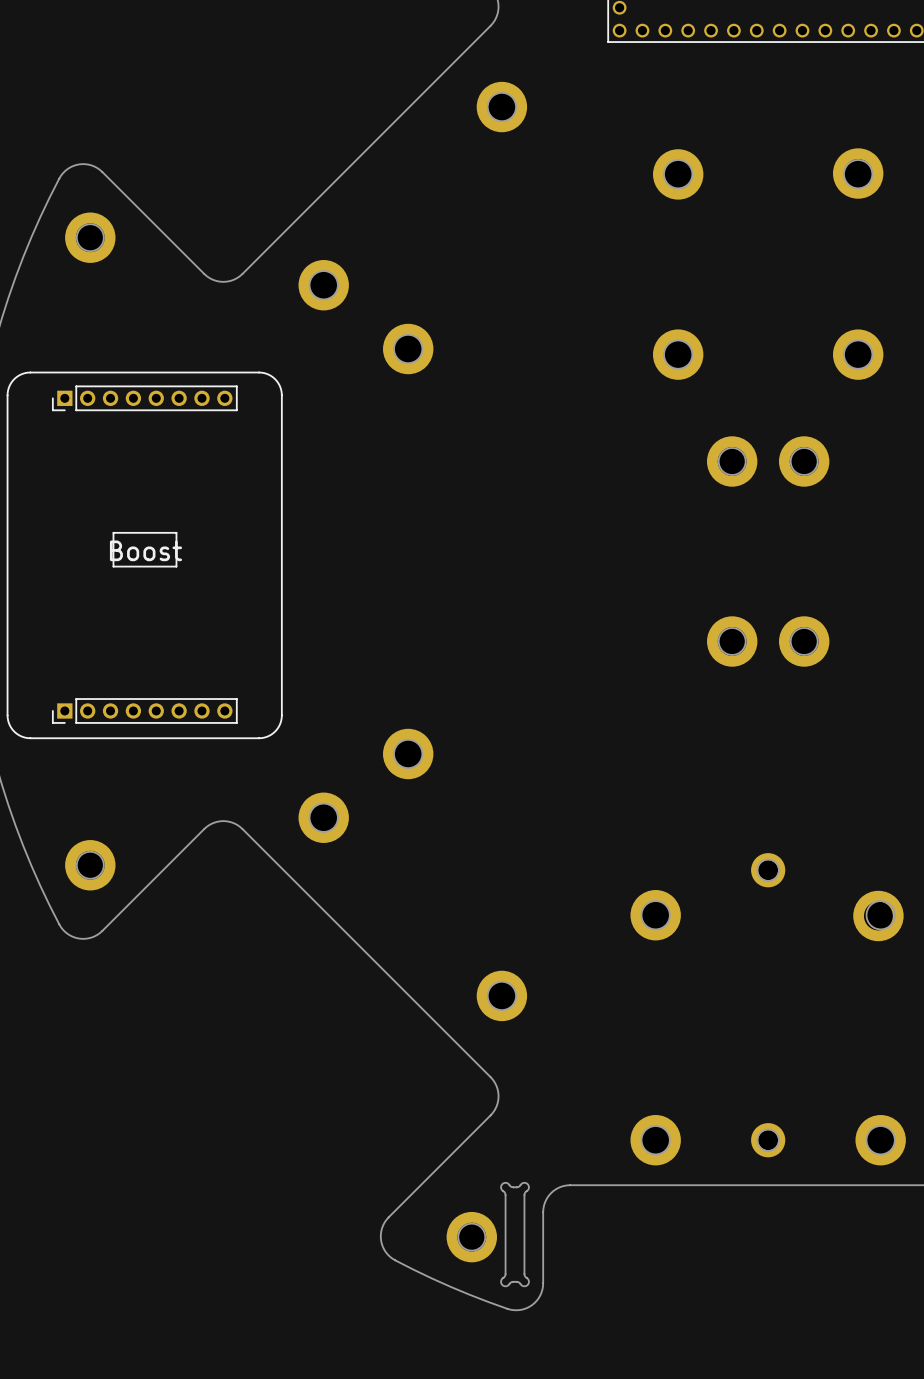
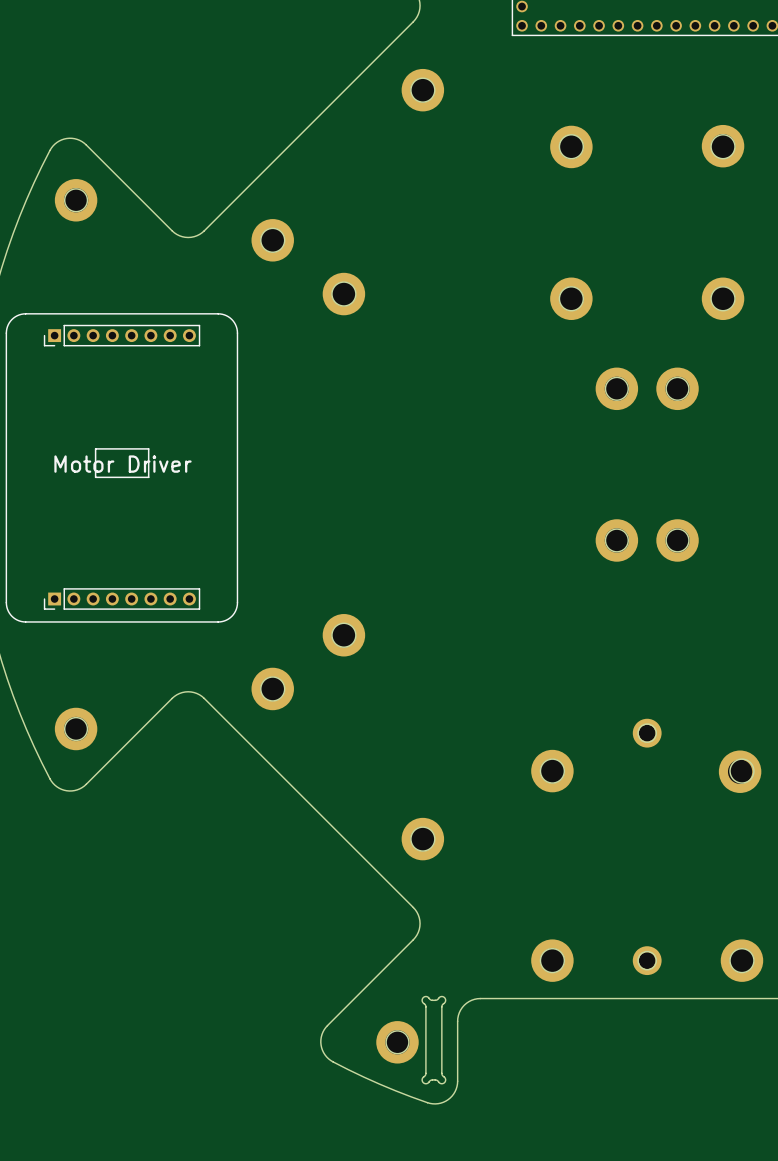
text: Boost (145, 550) -> Motor Driver (122, 464)

